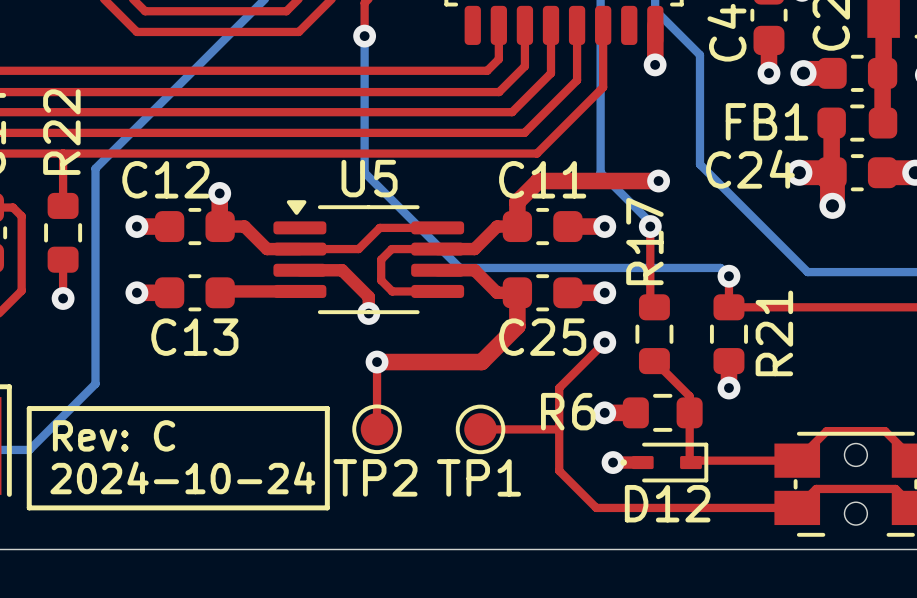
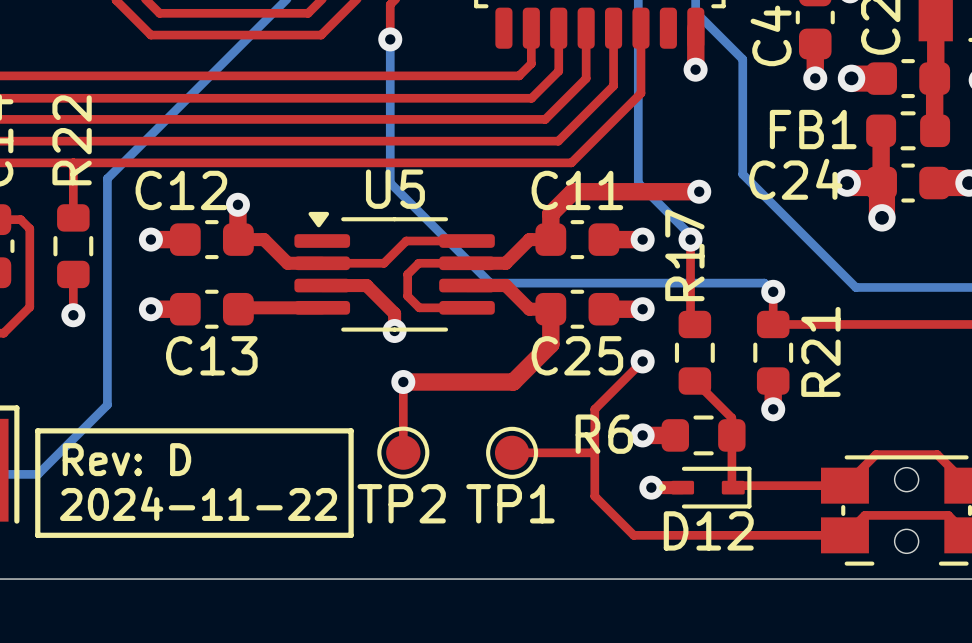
text: Rev: C (114, 435) -> Rev: D (126, 459)
text: 2024-10-24 (182, 477) -> 2024-11-22 (198, 503)

